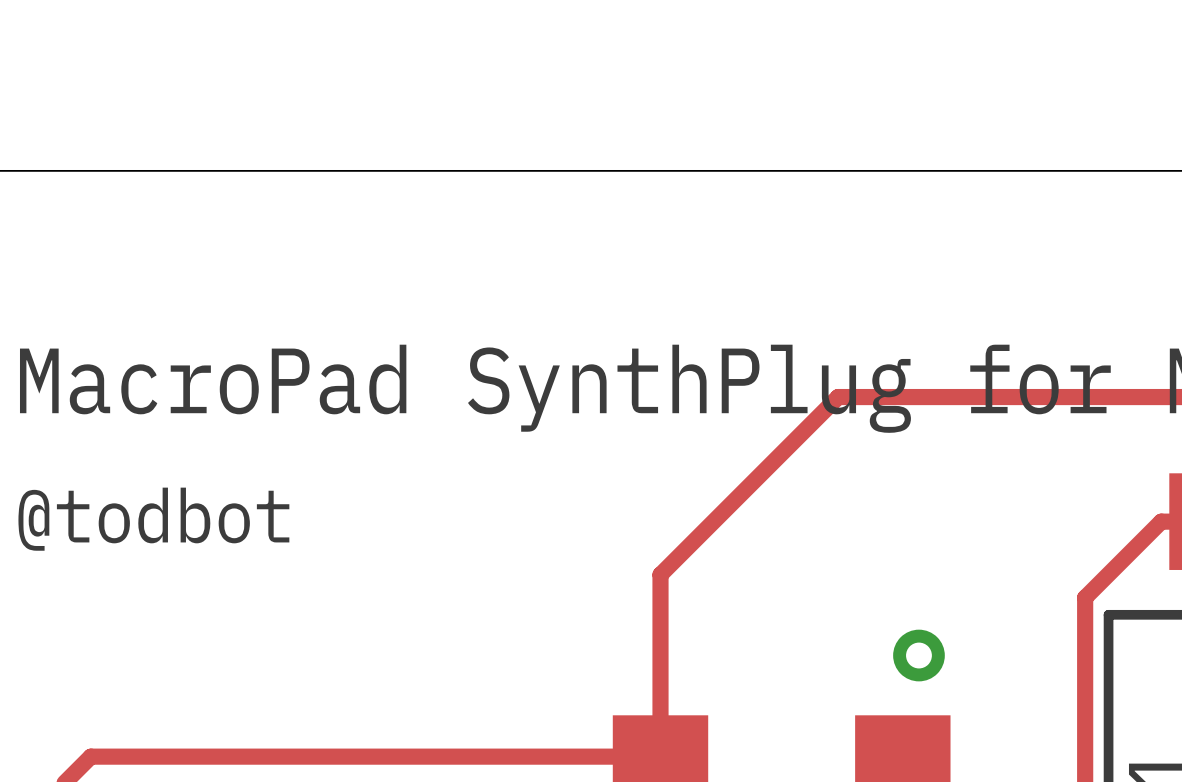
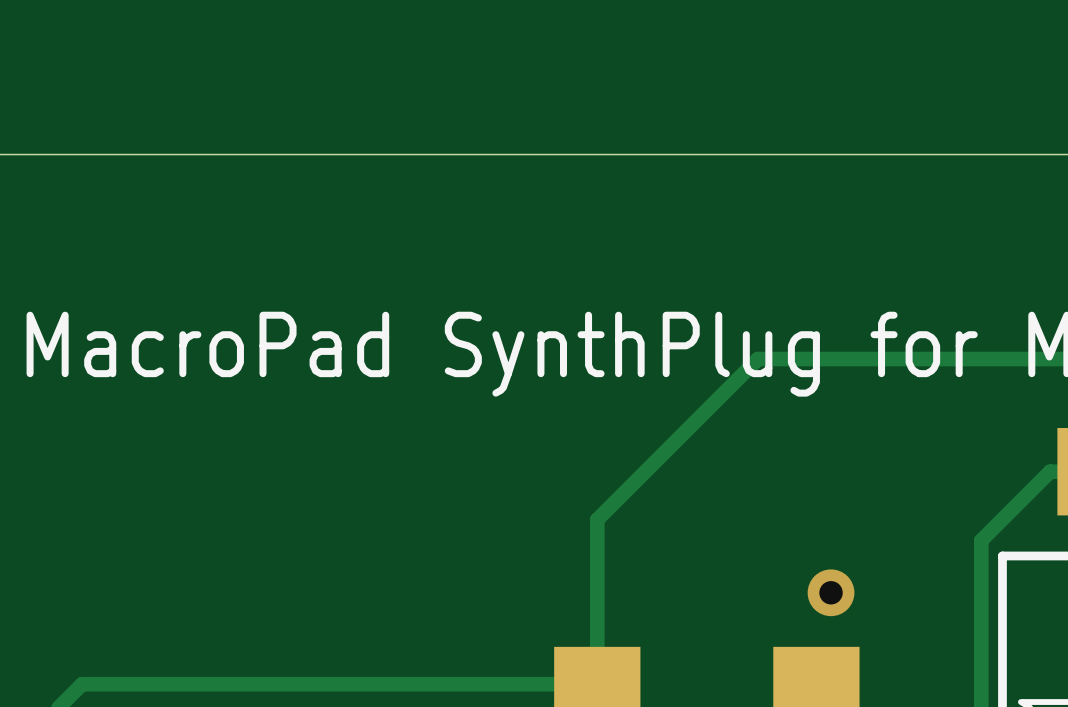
text: @todbot (153, 519) -> none

